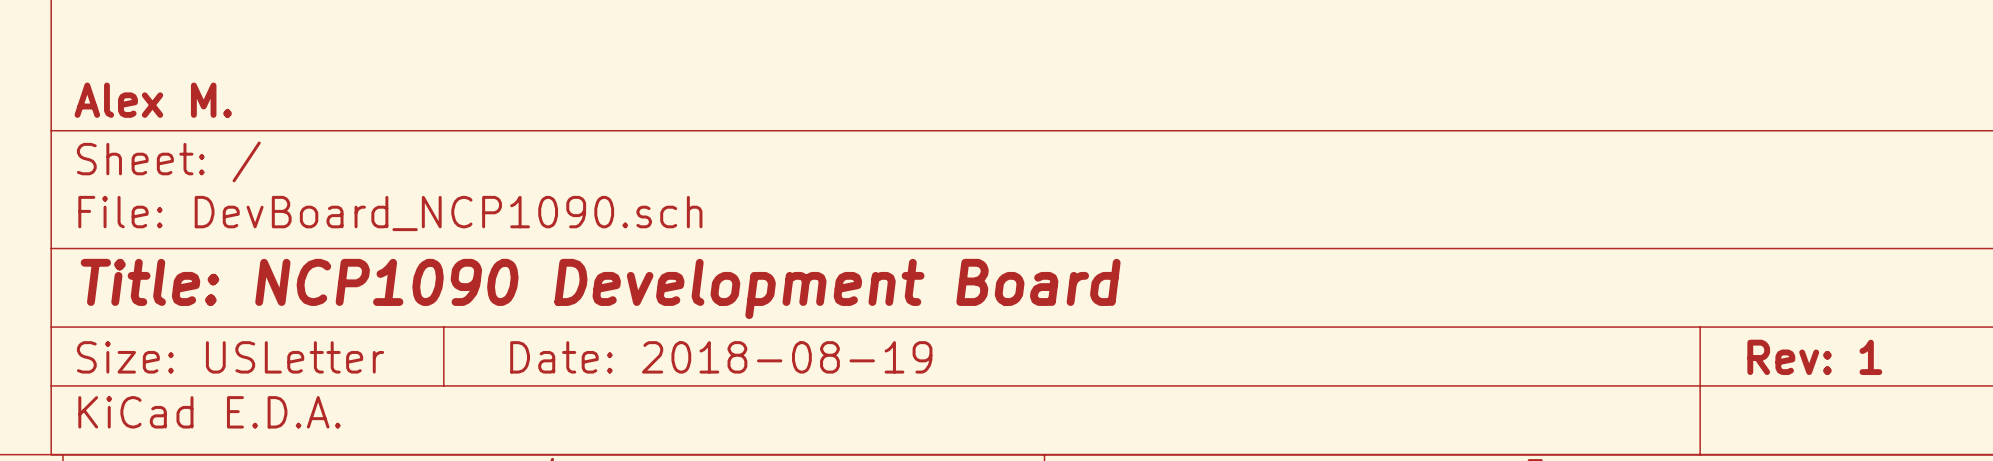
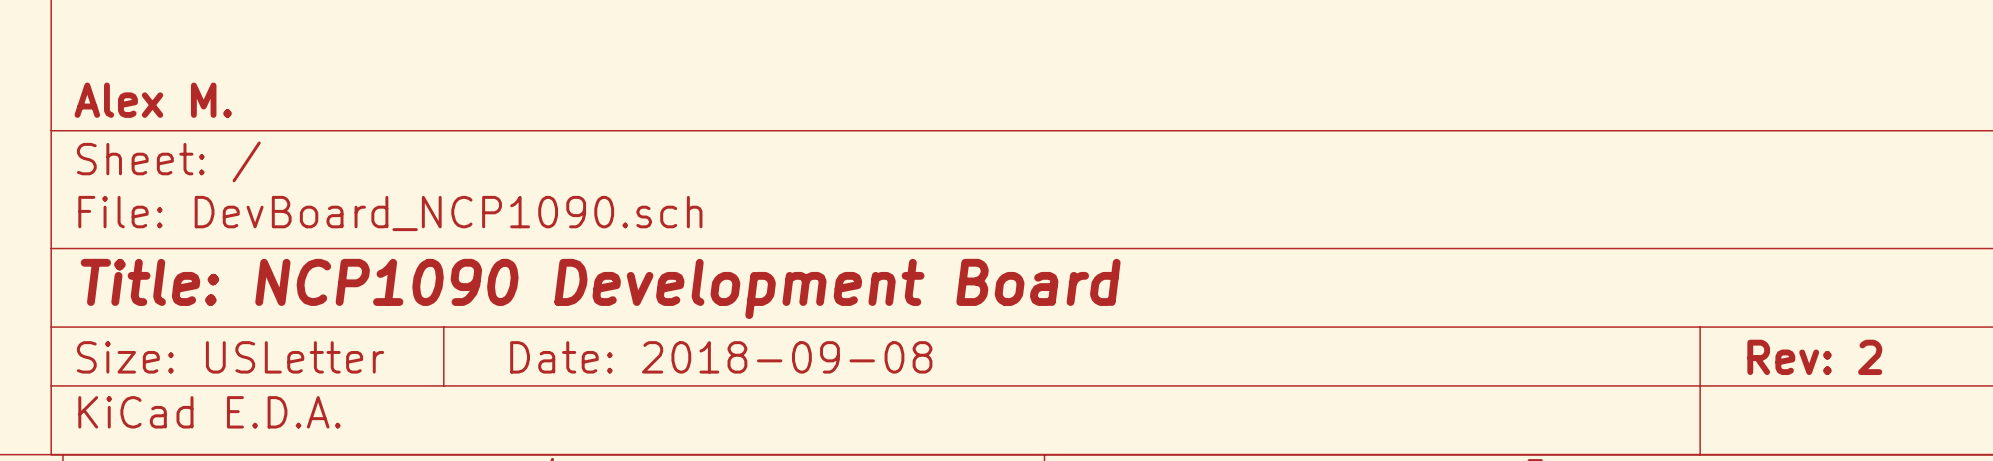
title block: Date: 2018-08-19 (721, 357) -> Date: 2018-09-08 (721, 357)
title block: Rev: 1 (1814, 357) -> Rev: 2 (1814, 357)

